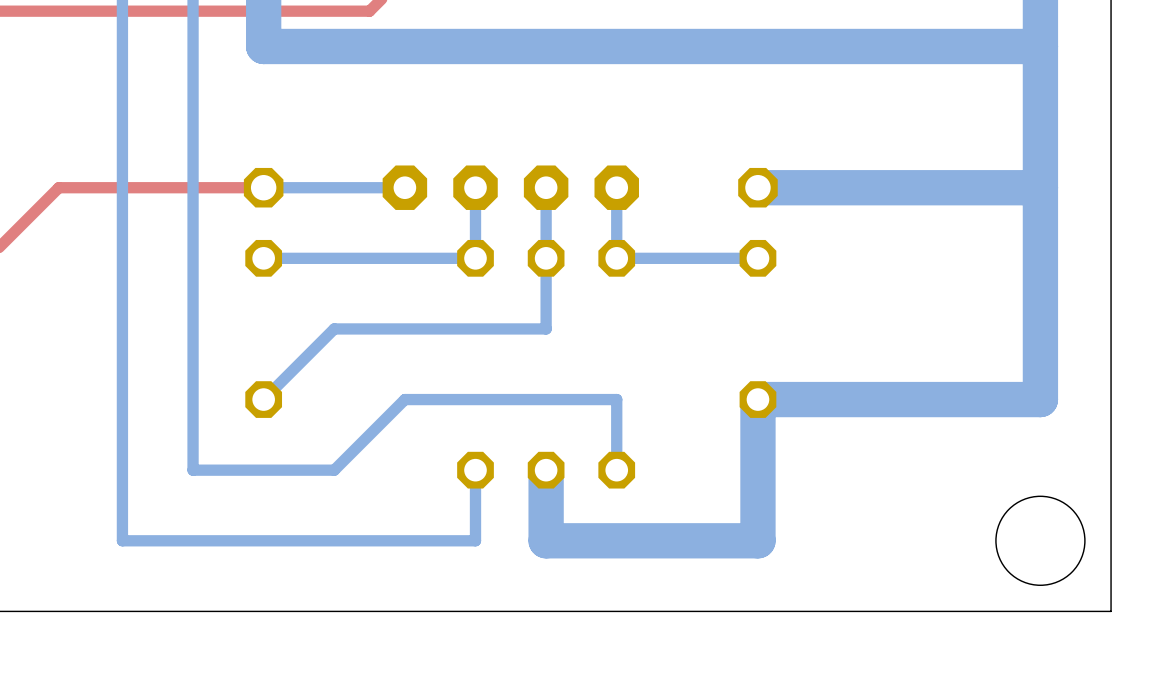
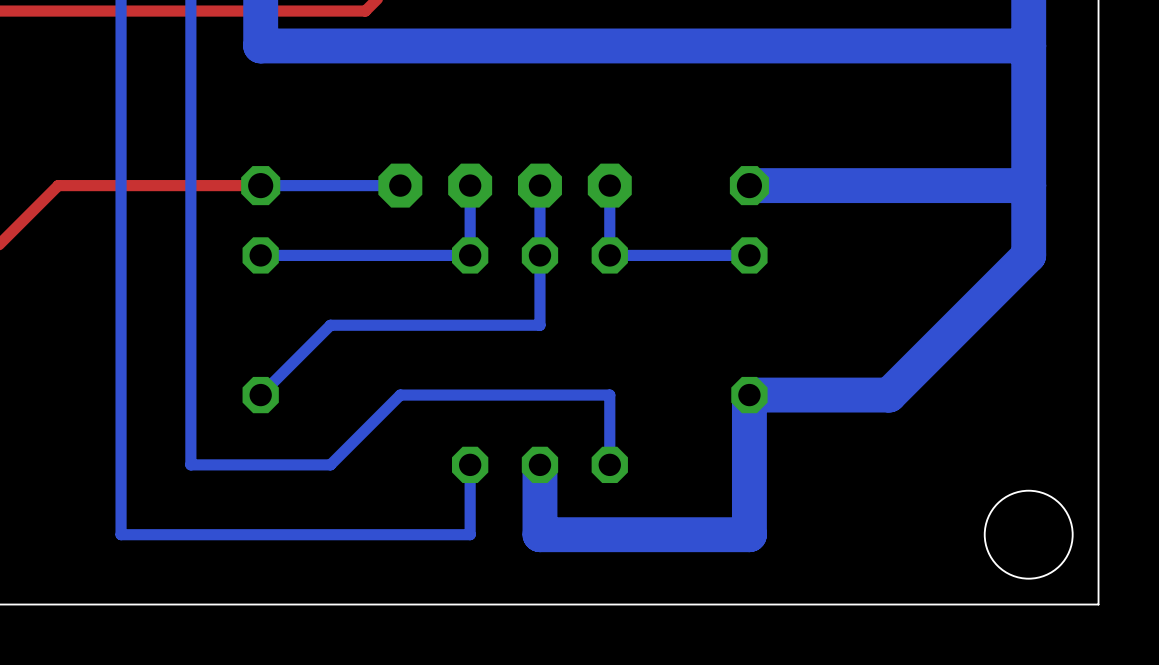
bottom track: (1040, 258) (1040, 399) (899, 399) -> (1028, 255) (889, 395)

